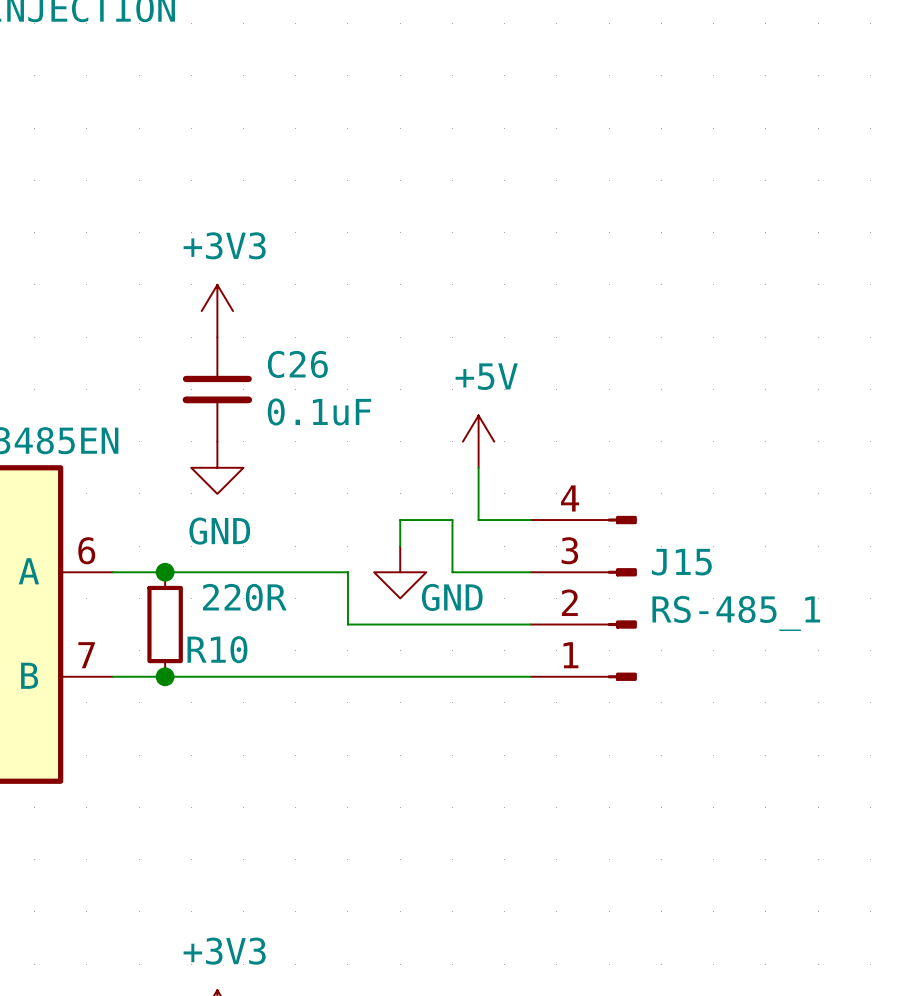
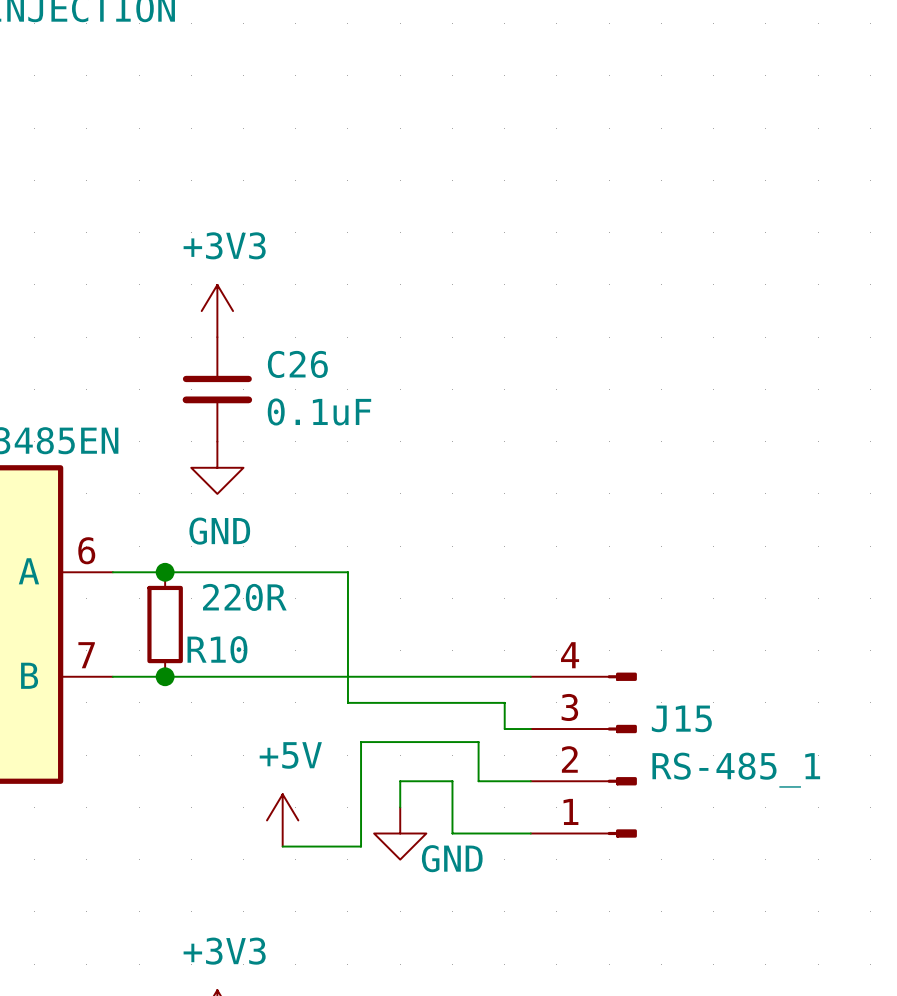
power symbol position: +5V (478, 441) -> +5V (282, 820)
wire: (478, 467) (478, 520) (530, 520) -> none
wire: (400, 546) (400, 520) (452, 520) (452, 572) (530, 572) -> (400, 807) (400, 781) (452, 781) (452, 833) (530, 833)
power symbol position: GND (400, 572) -> GND (400, 833)
J15 position: (583, 598) -> (583, 755)
wire: (347, 624) (530, 624) -> (347, 624) (347, 702) (504, 702) (504, 729) (530, 729)
wire: none -> (530, 781) (478, 781) (478, 742) (361, 742) (361, 846) (282, 846)

